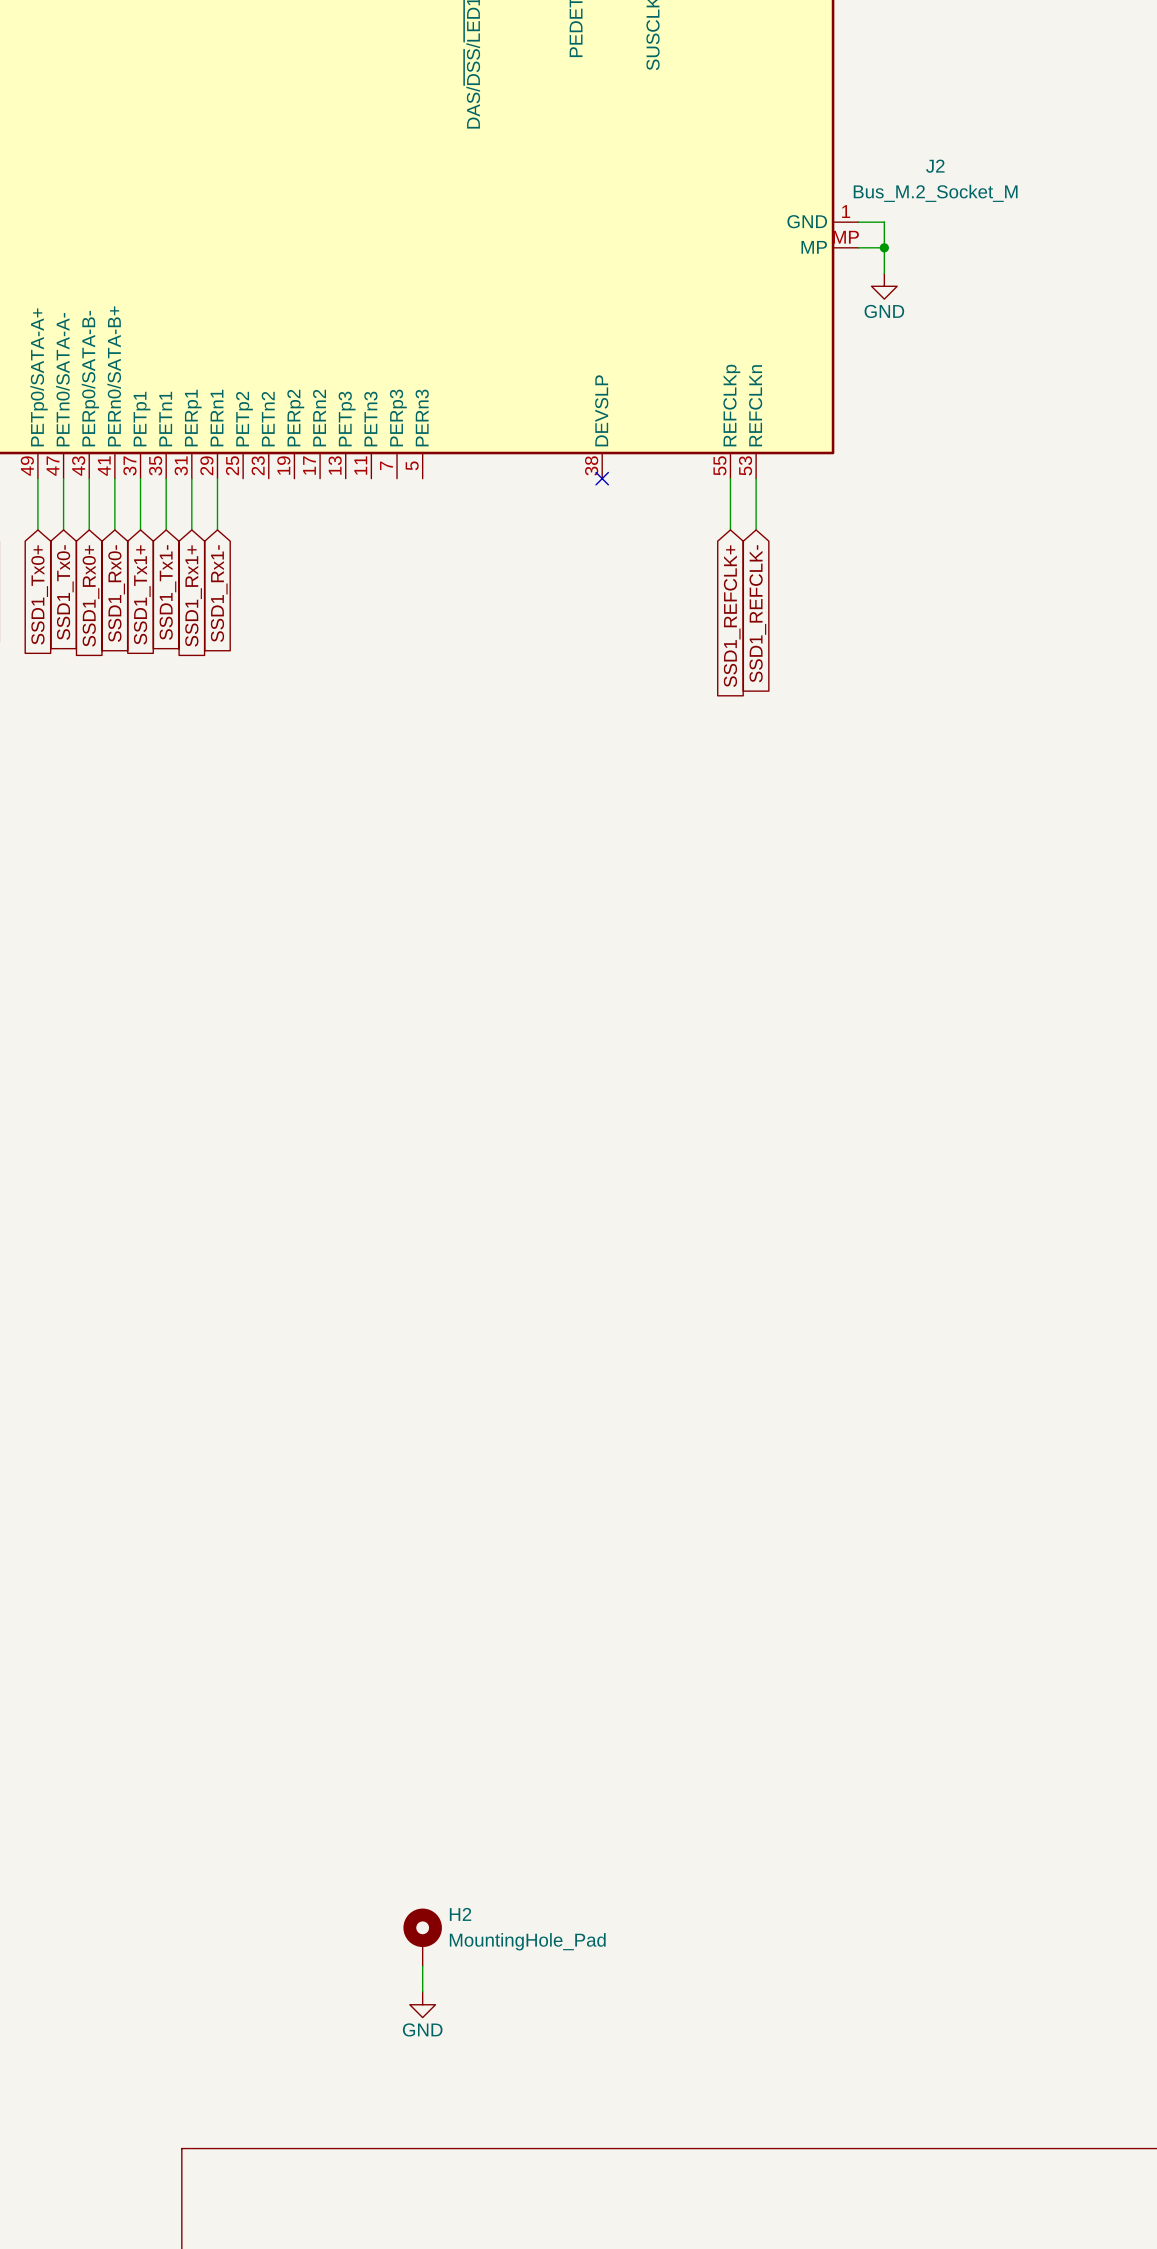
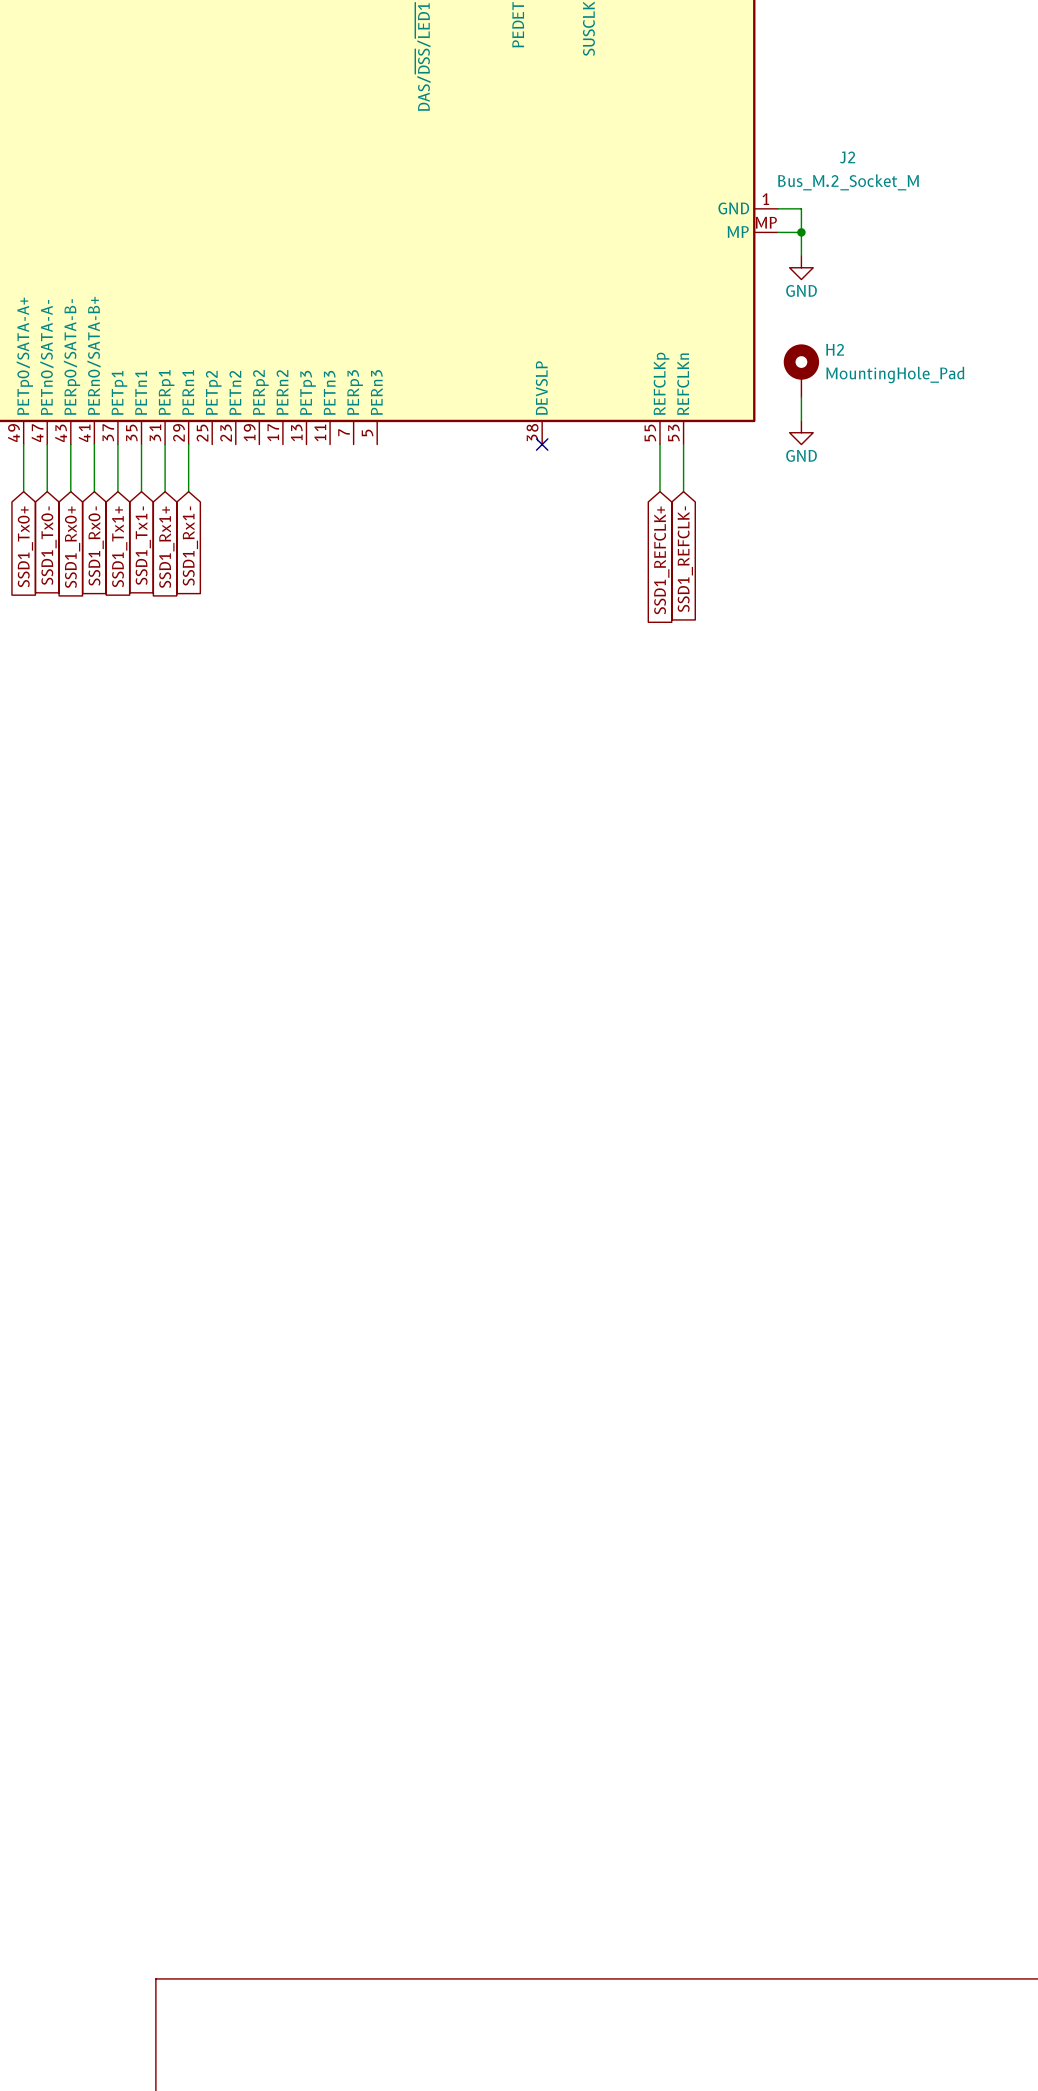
wire: none -> (801, 397) (801, 420)
power symbol: none -> GND (801, 432)
H2 position: (422, 1937) -> (801, 370)
wire: (422, 1966) (422, 1991) -> none
power symbol: GND (422, 2004) -> none

